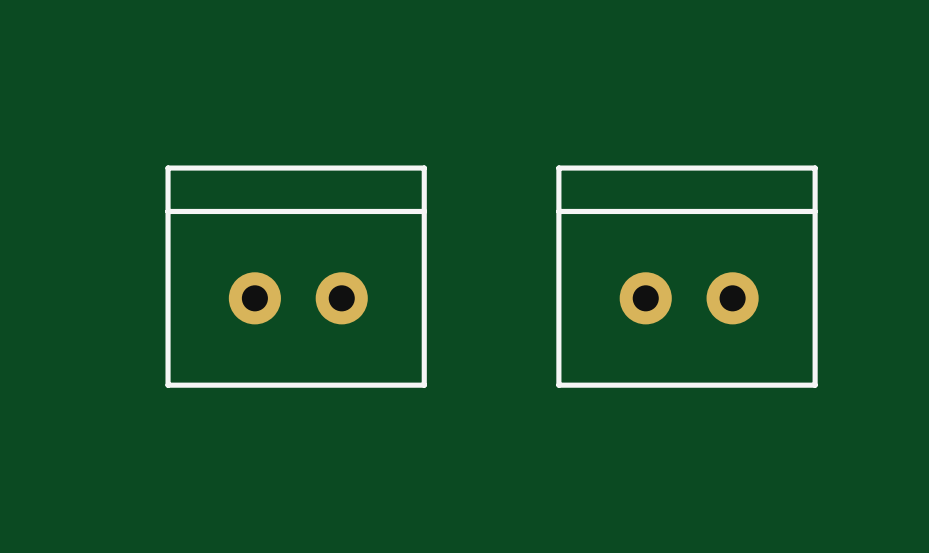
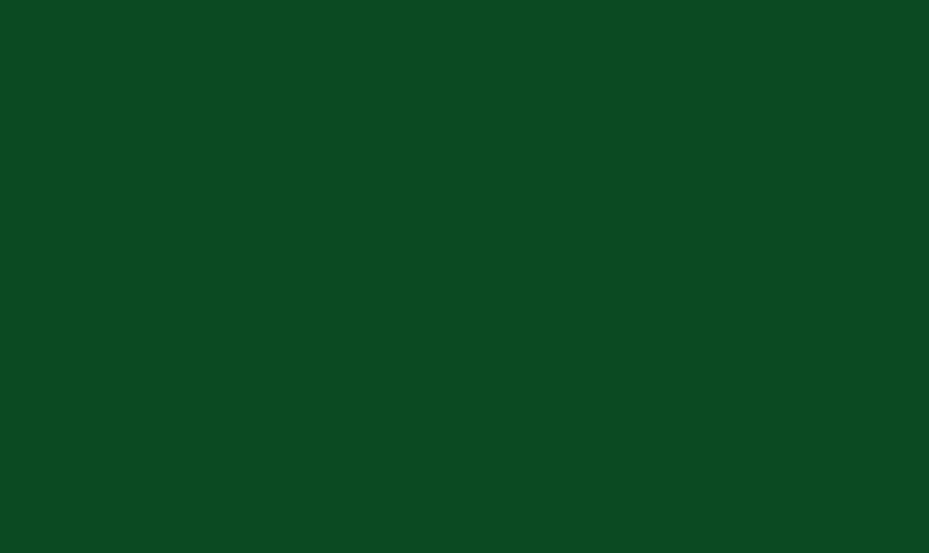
part: (296, 276) -> none
part: (687, 276) -> none

